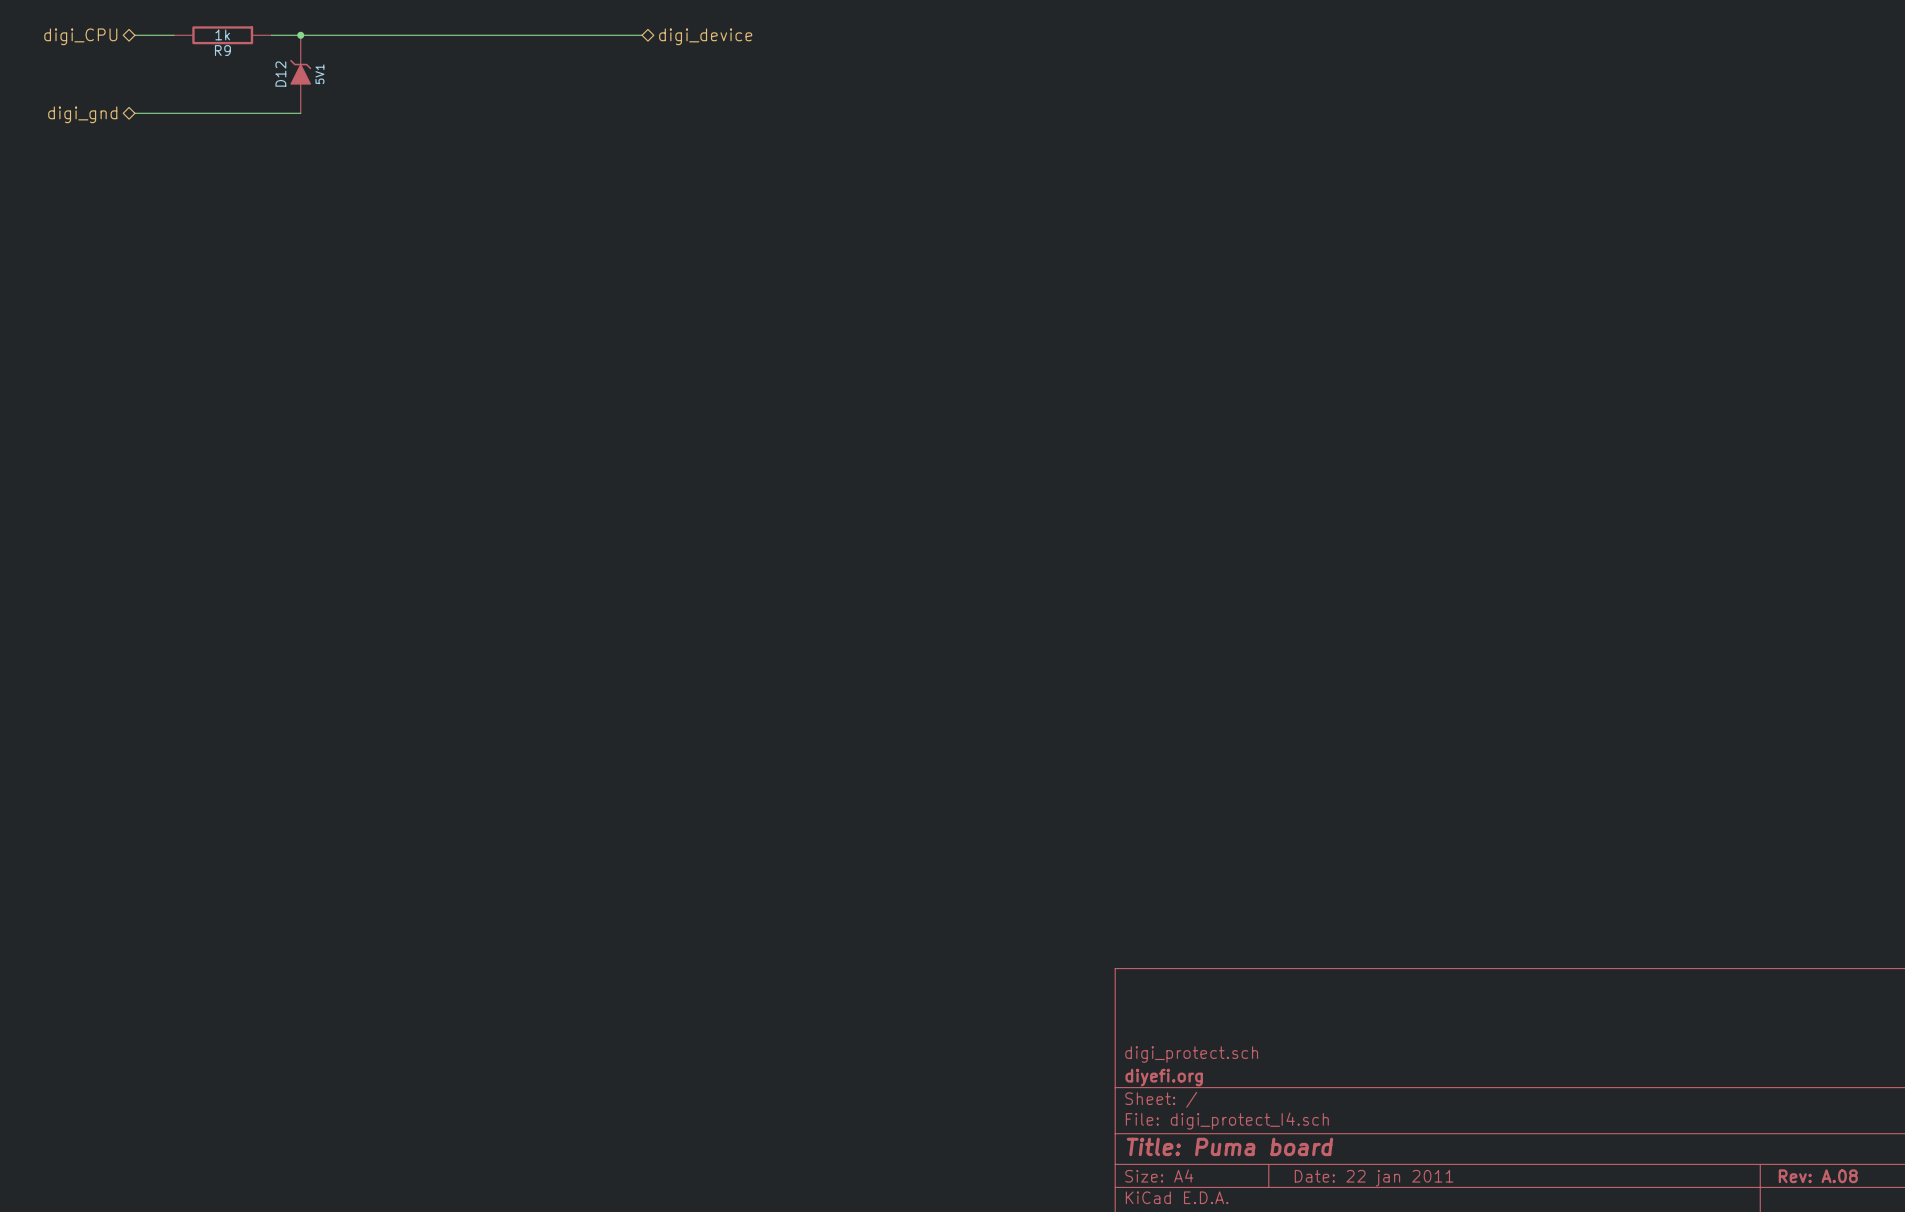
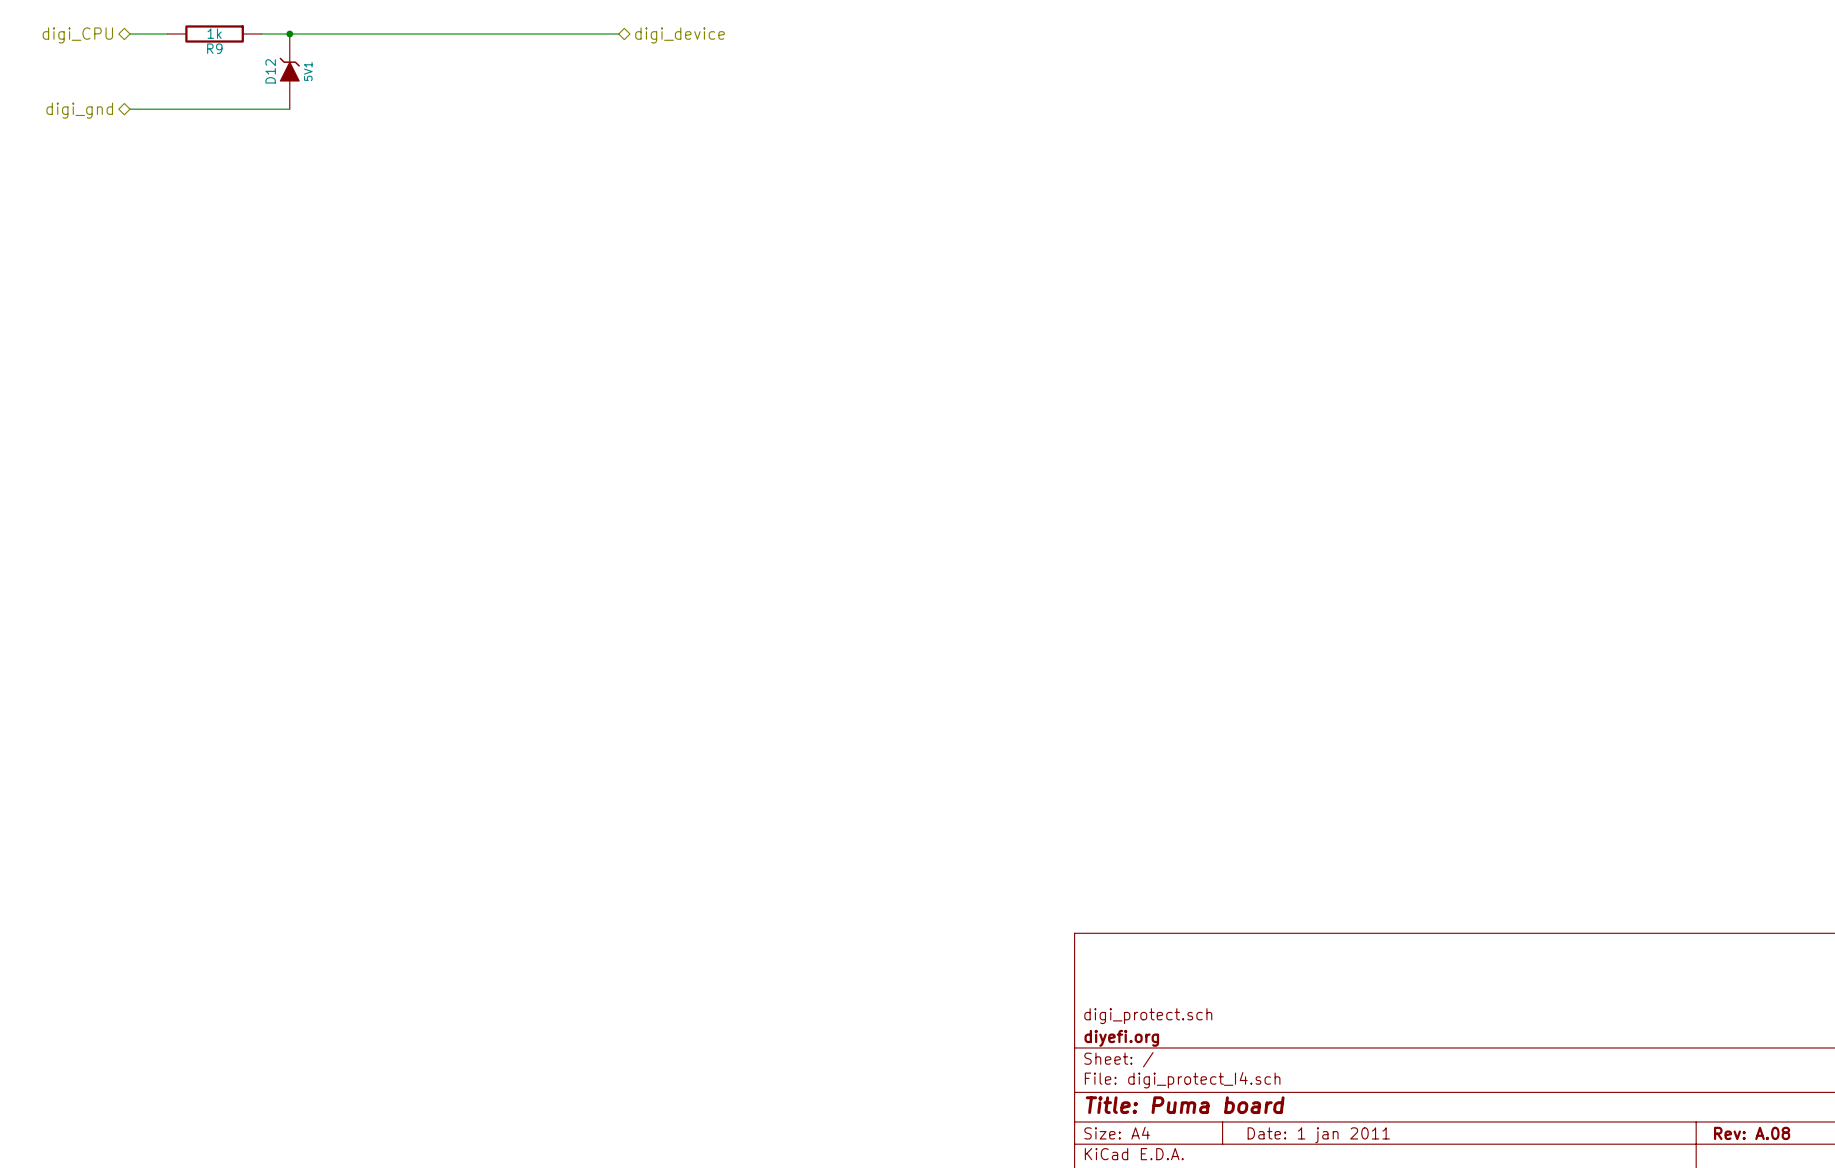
title block: Date: 22 jan 2011 (1374, 1178) -> Date: 1 jan 2011 (1318, 1135)

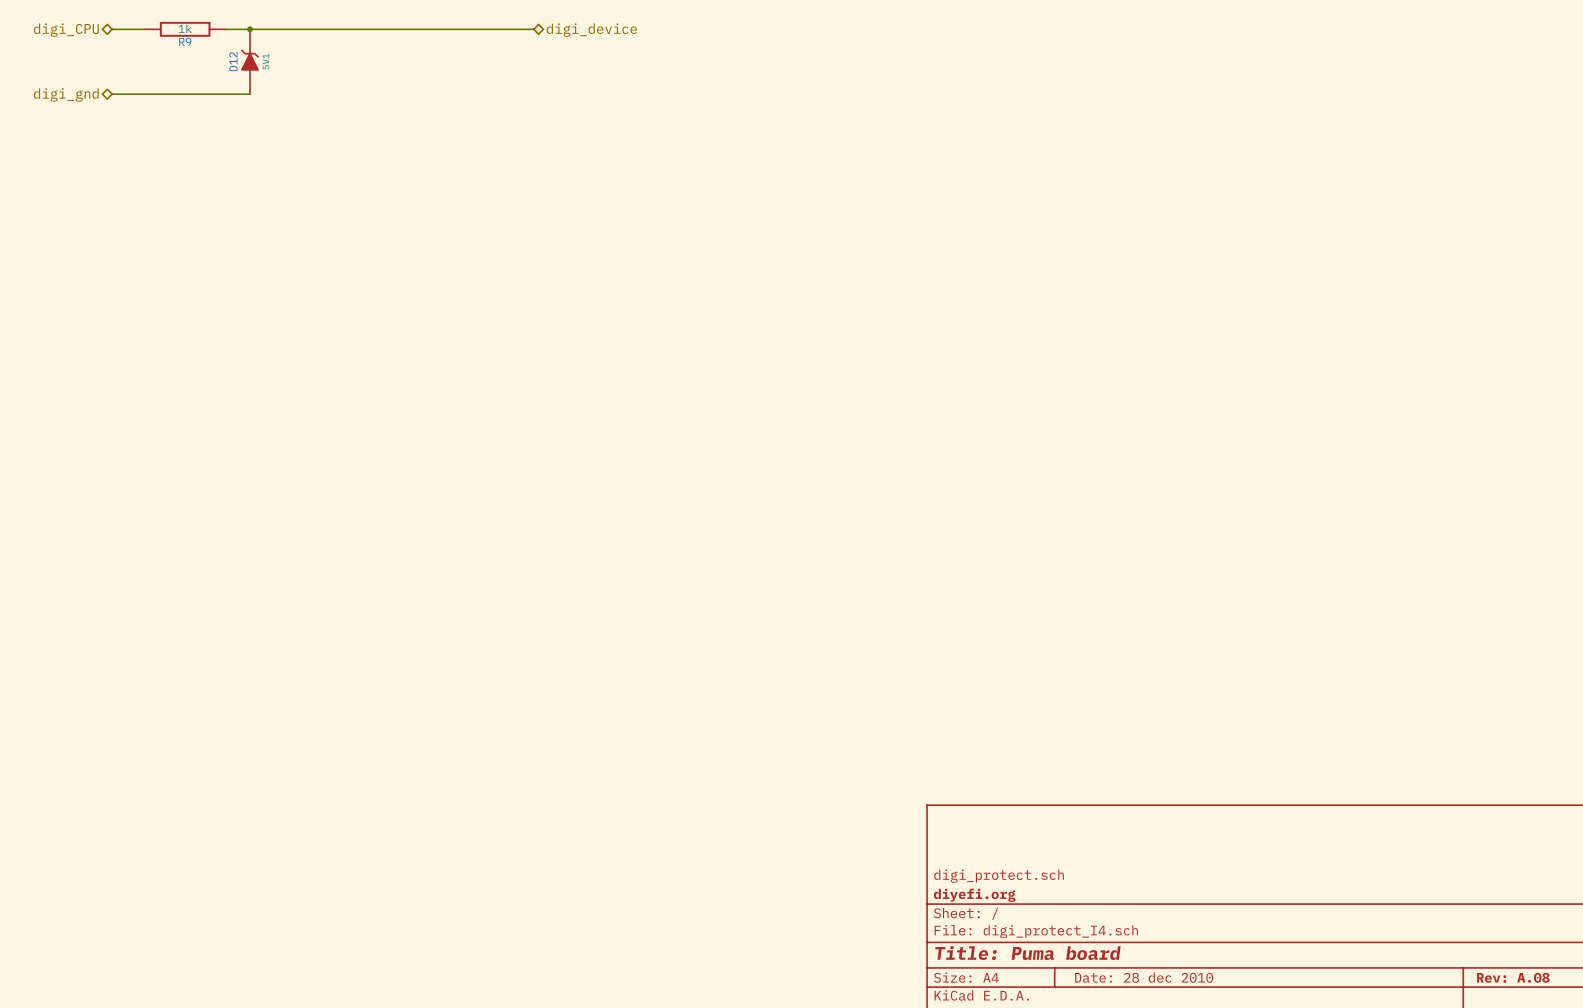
title block: Date: 1 jan 2011 (1318, 1135) -> Date: 28 dec 2010 (1144, 977)

